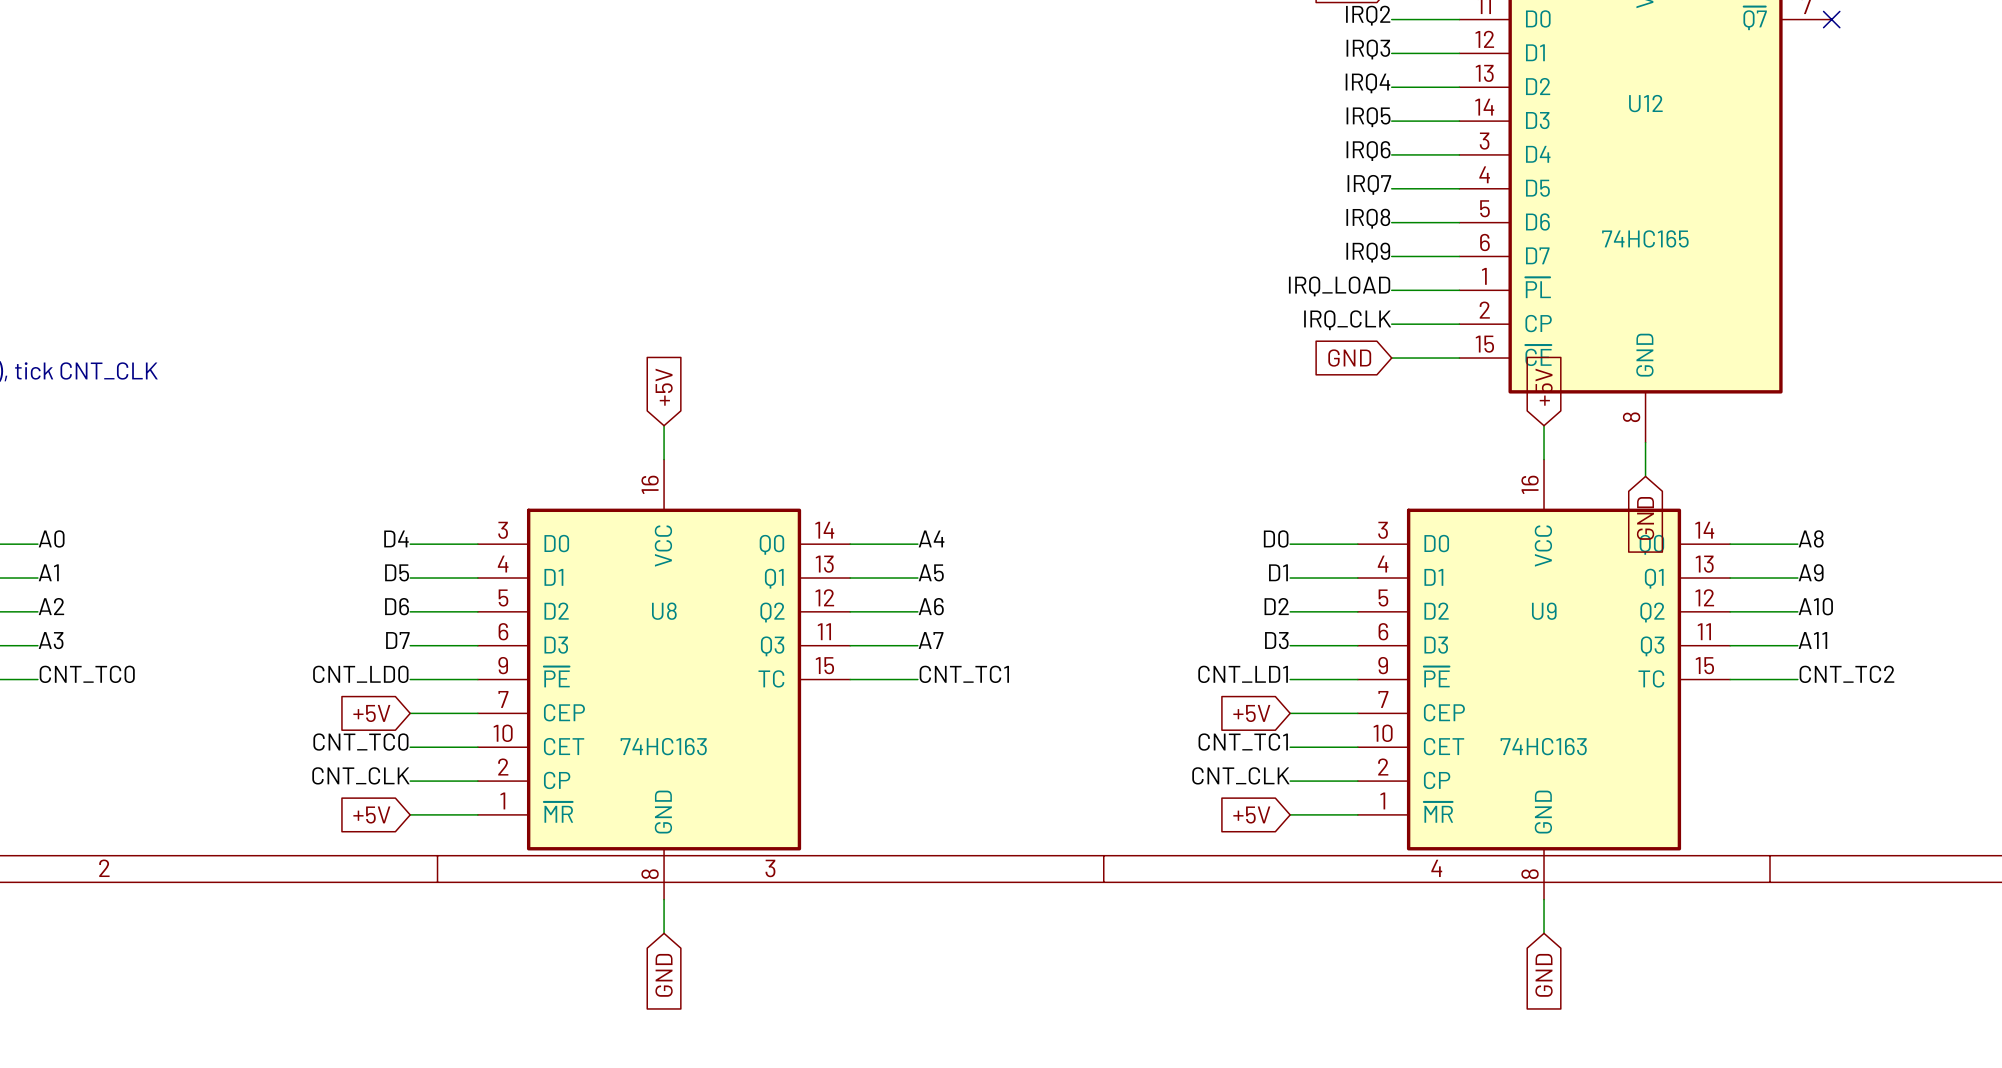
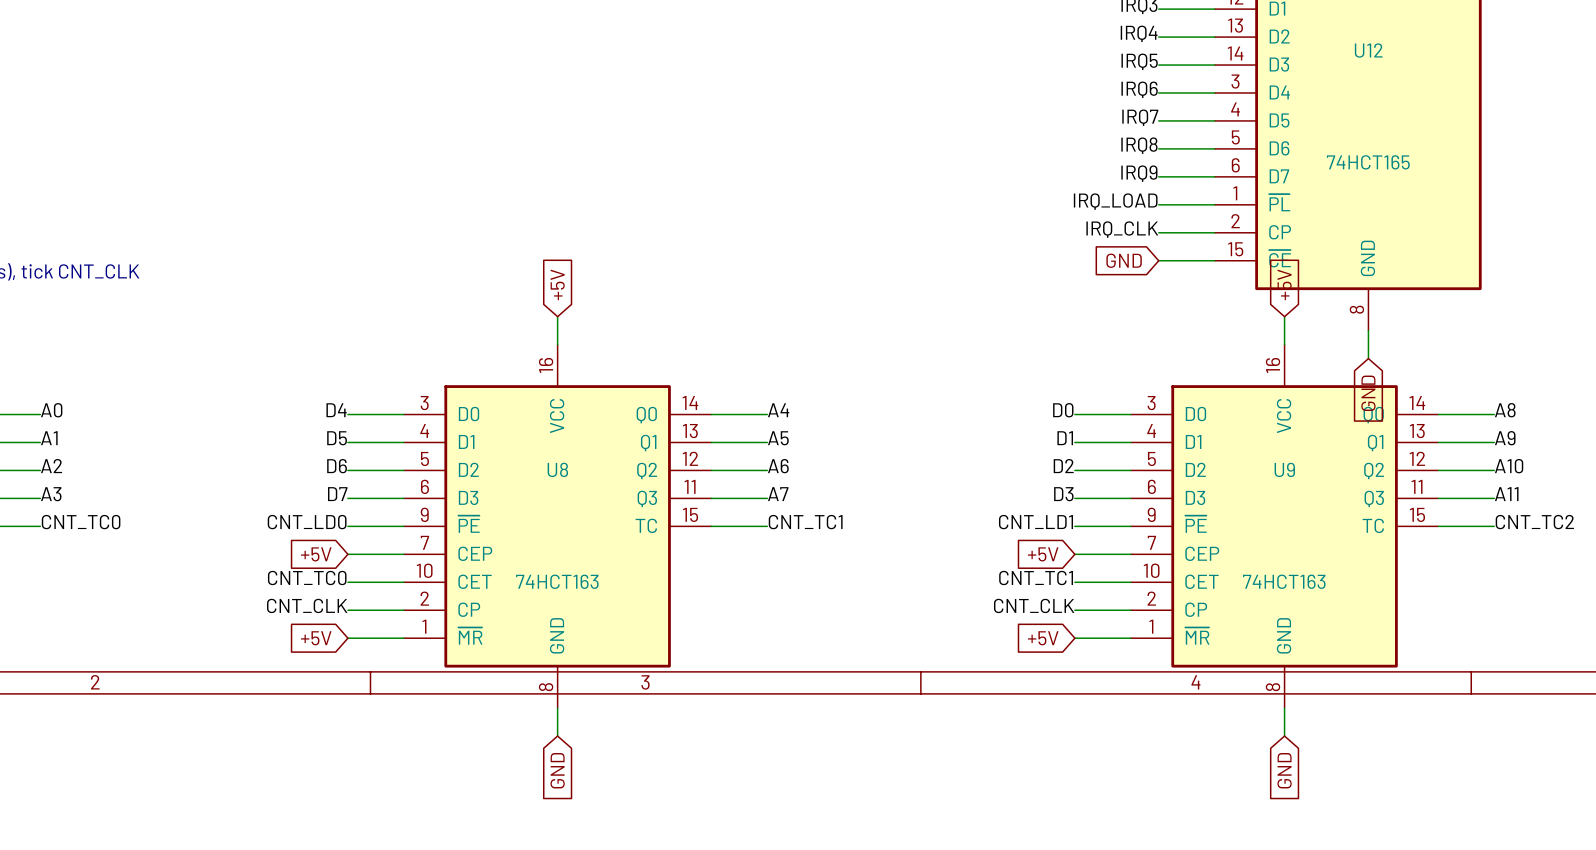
U12 value: 74HC165 (1645, 238) -> 74HCT165 (1368, 162)
U8 value: 74HC163 (663, 746) -> 74HCT163 (557, 581)
U9 value: 74HC163 (1543, 746) -> 74HCT163 (1284, 581)

